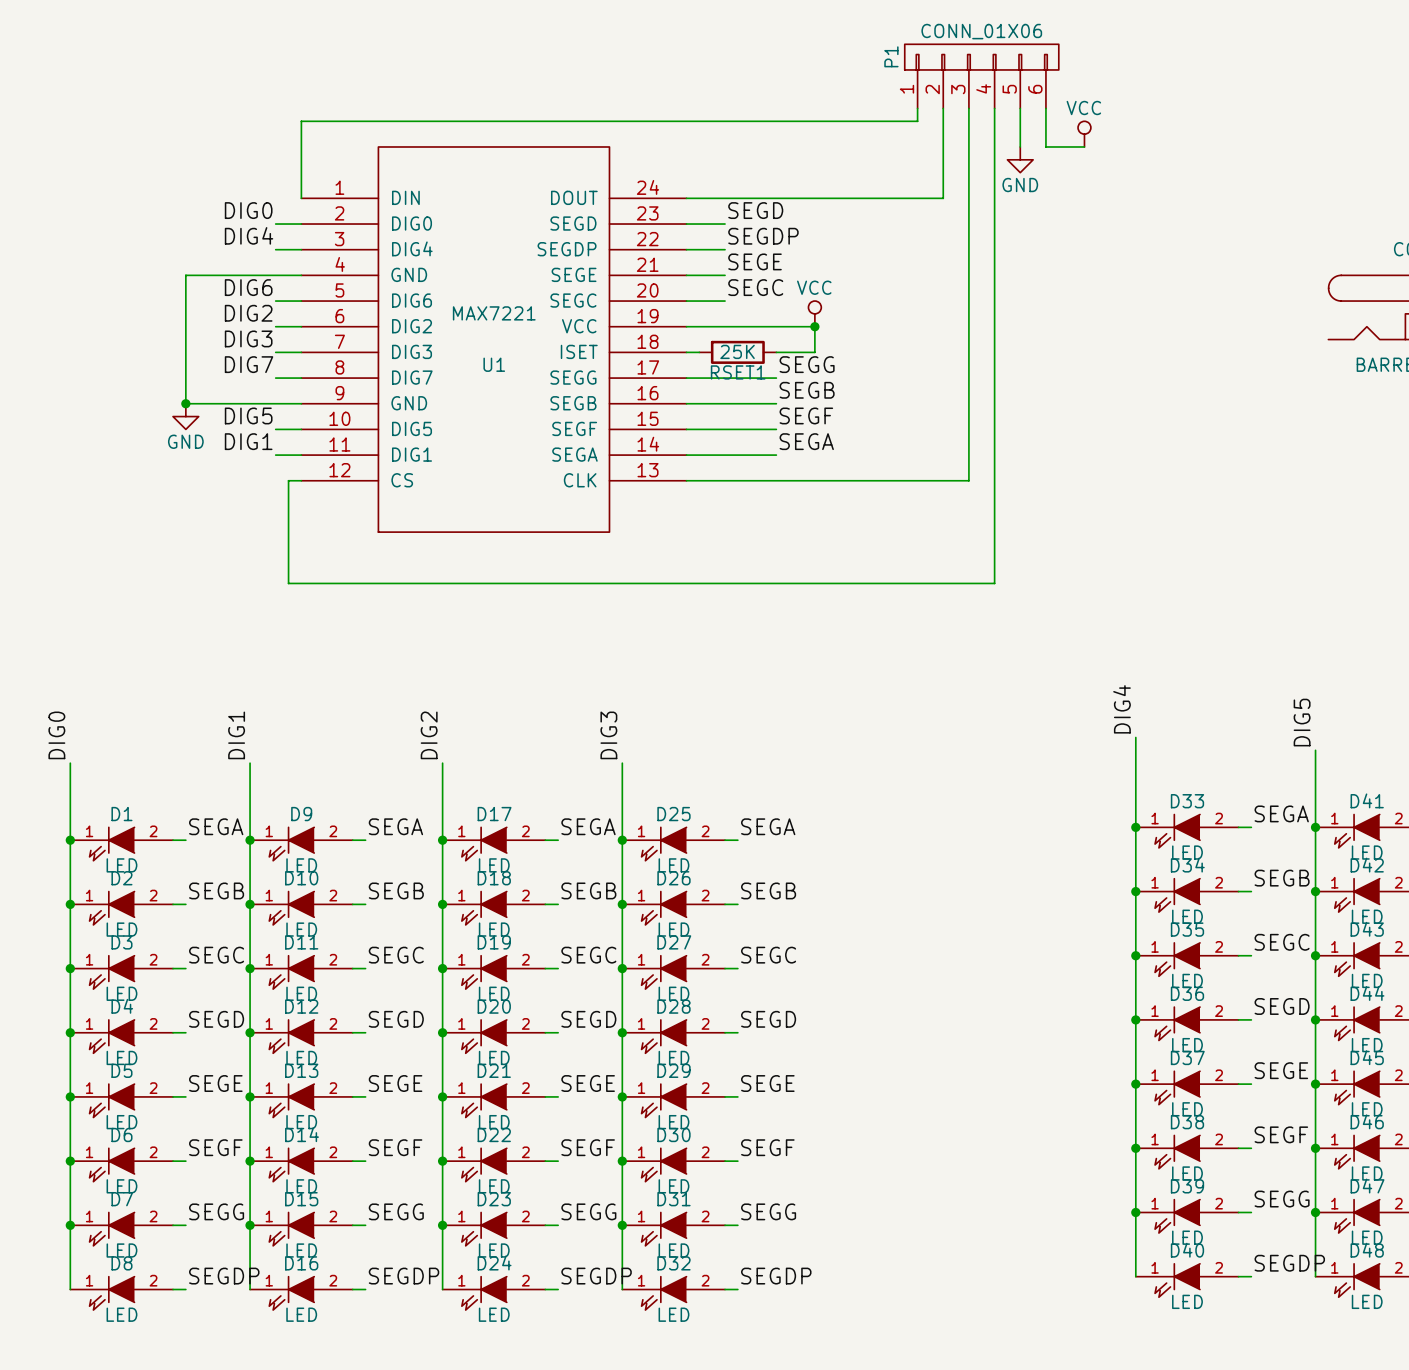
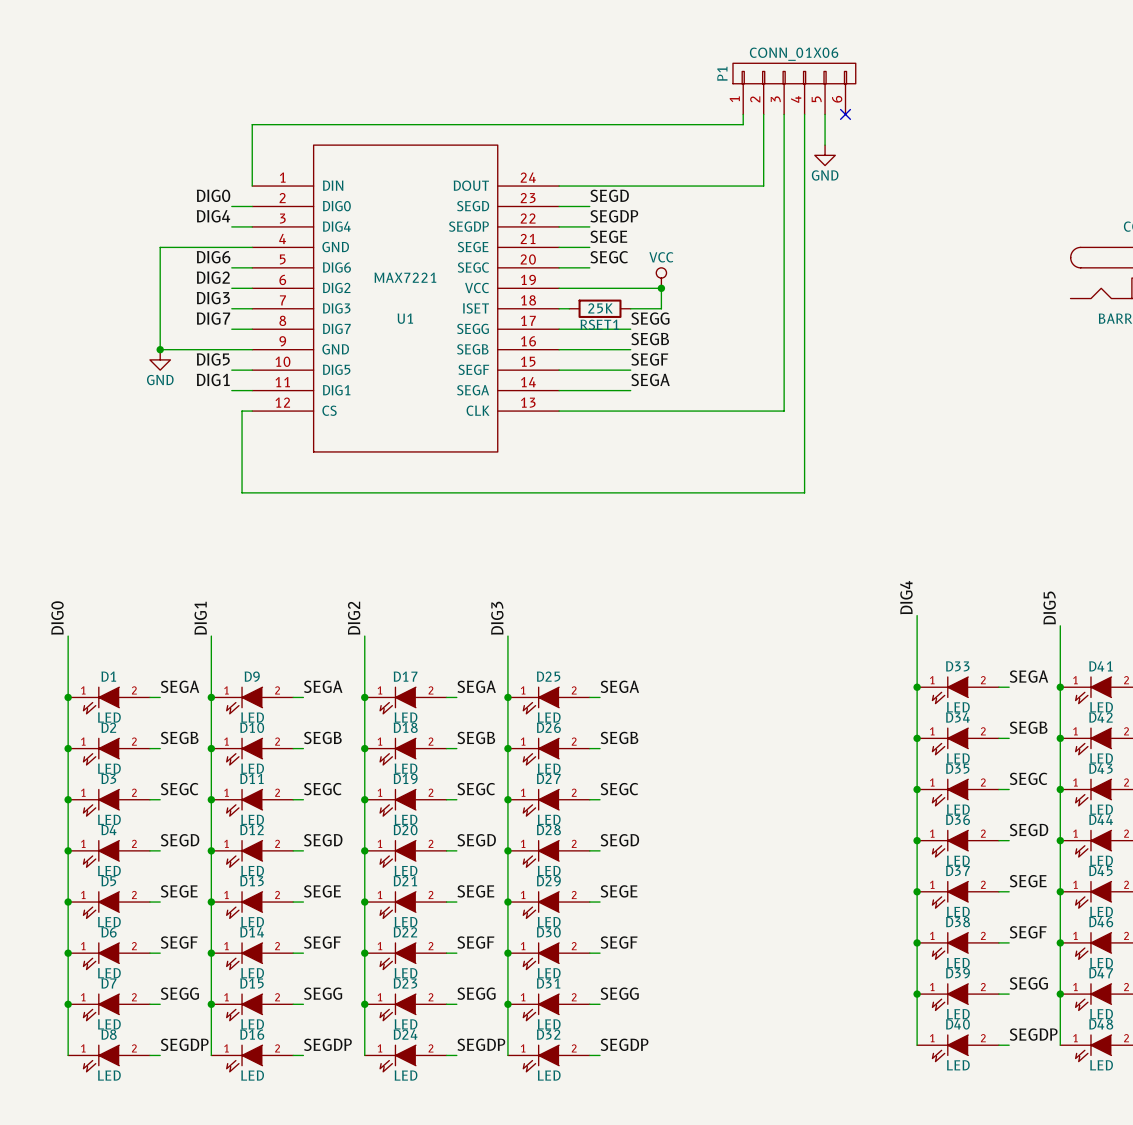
wire: (1045, 108) (1045, 146) (1084, 146) -> none
no-connect mark: none -> (845, 114)
power symbol: VCC (1084, 134) -> none

